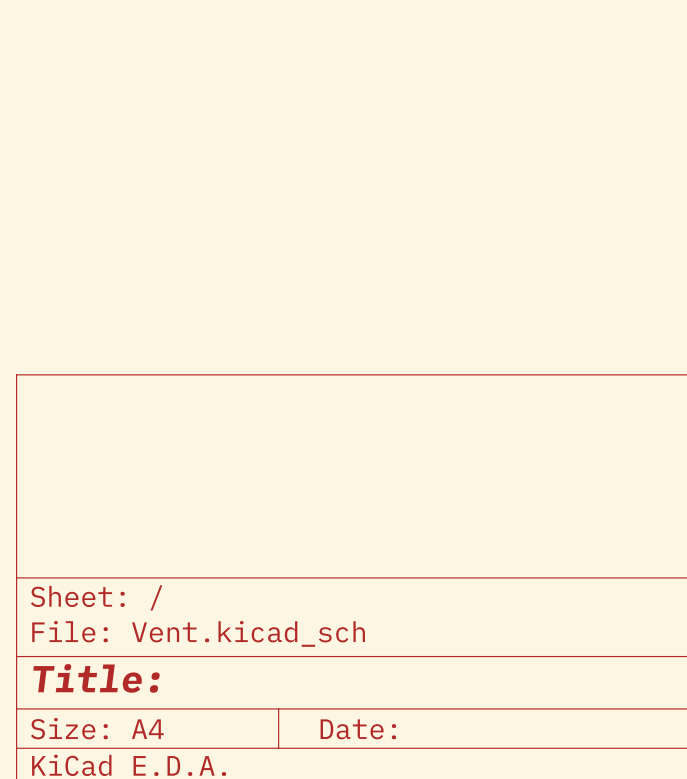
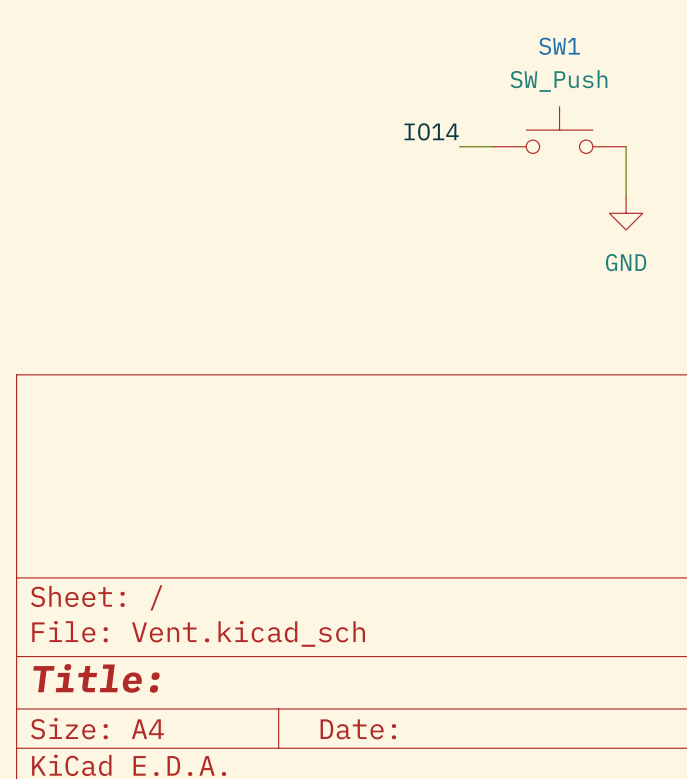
SW1: none -> SW_Push (559, 130)
label: none -> IO14 (431, 131)
wire: none -> (459, 146) (492, 146)
wire: none -> (626, 146) (626, 196)
power symbol: none -> GND (626, 213)

